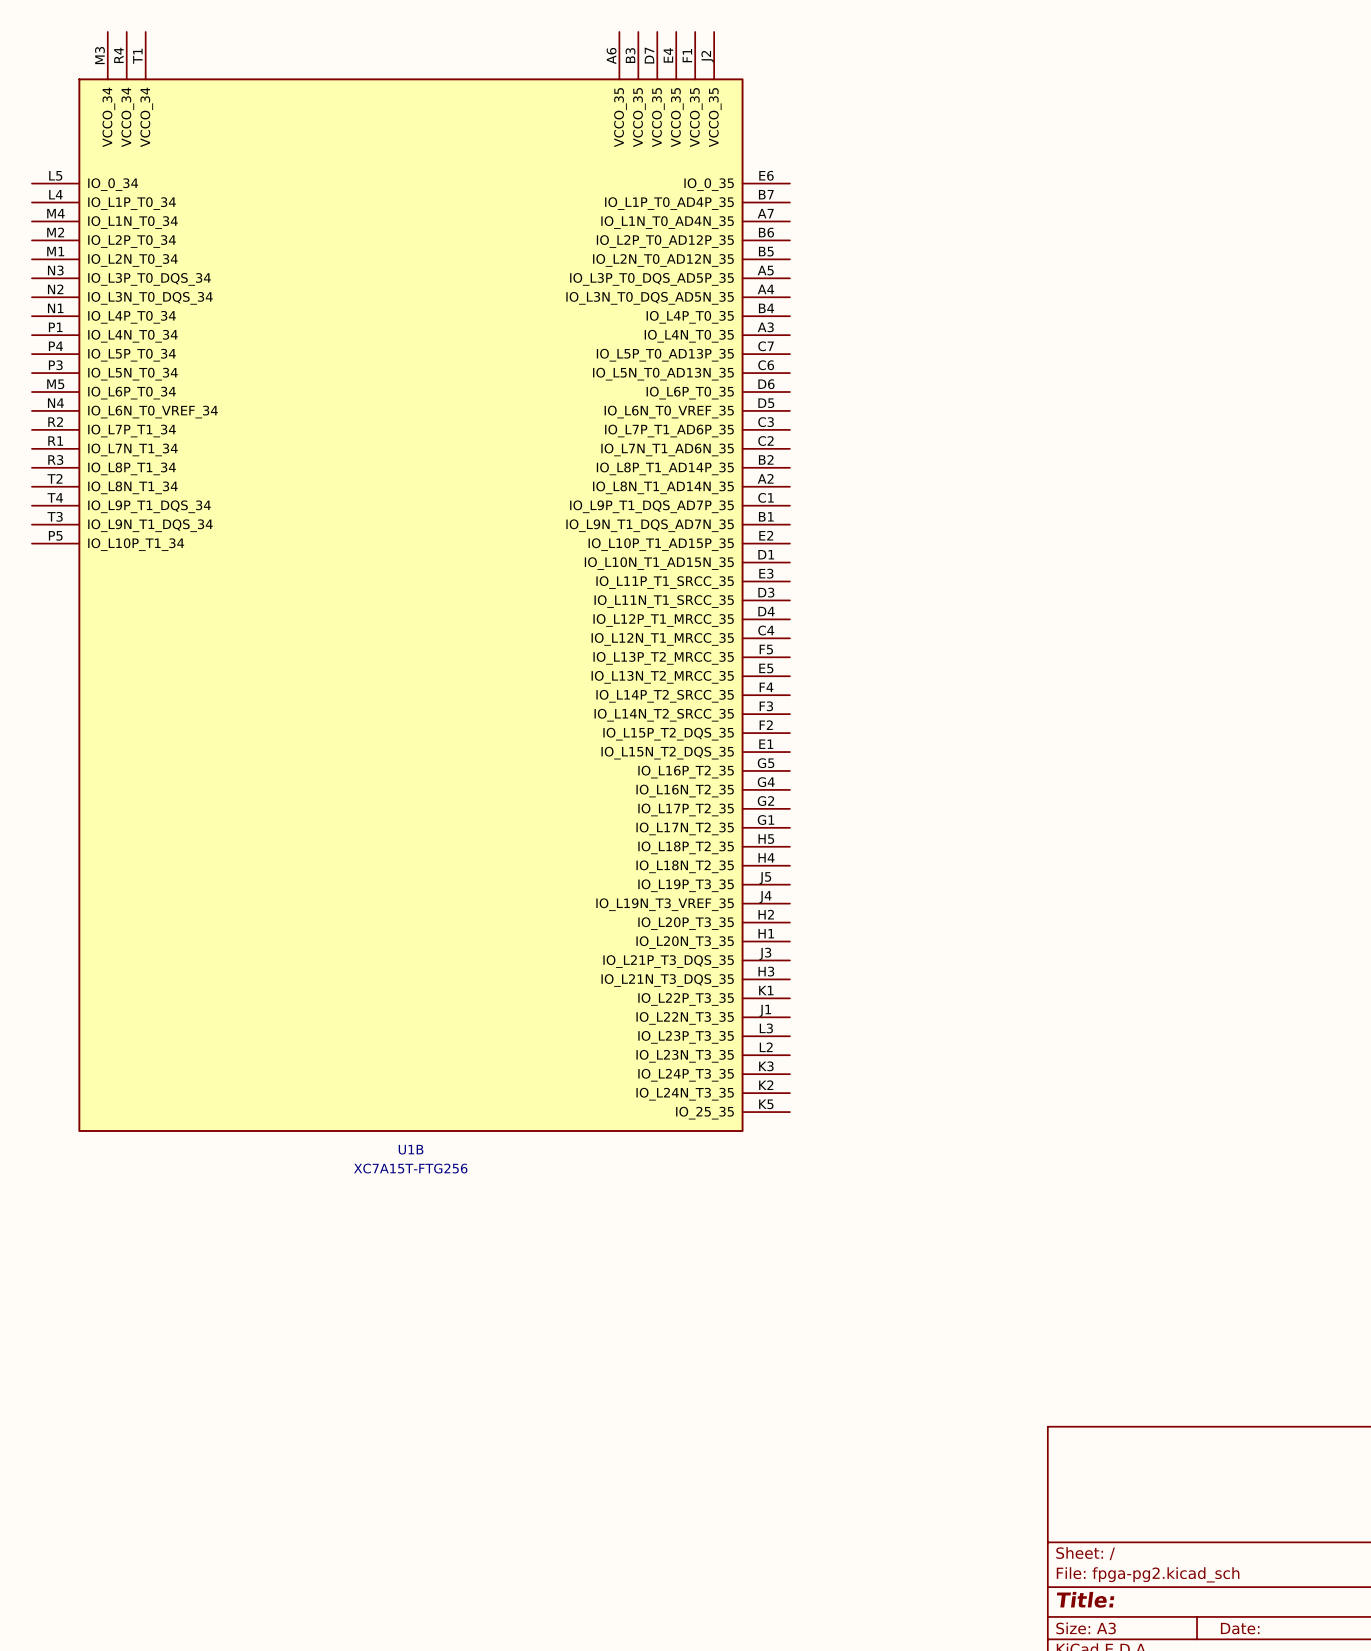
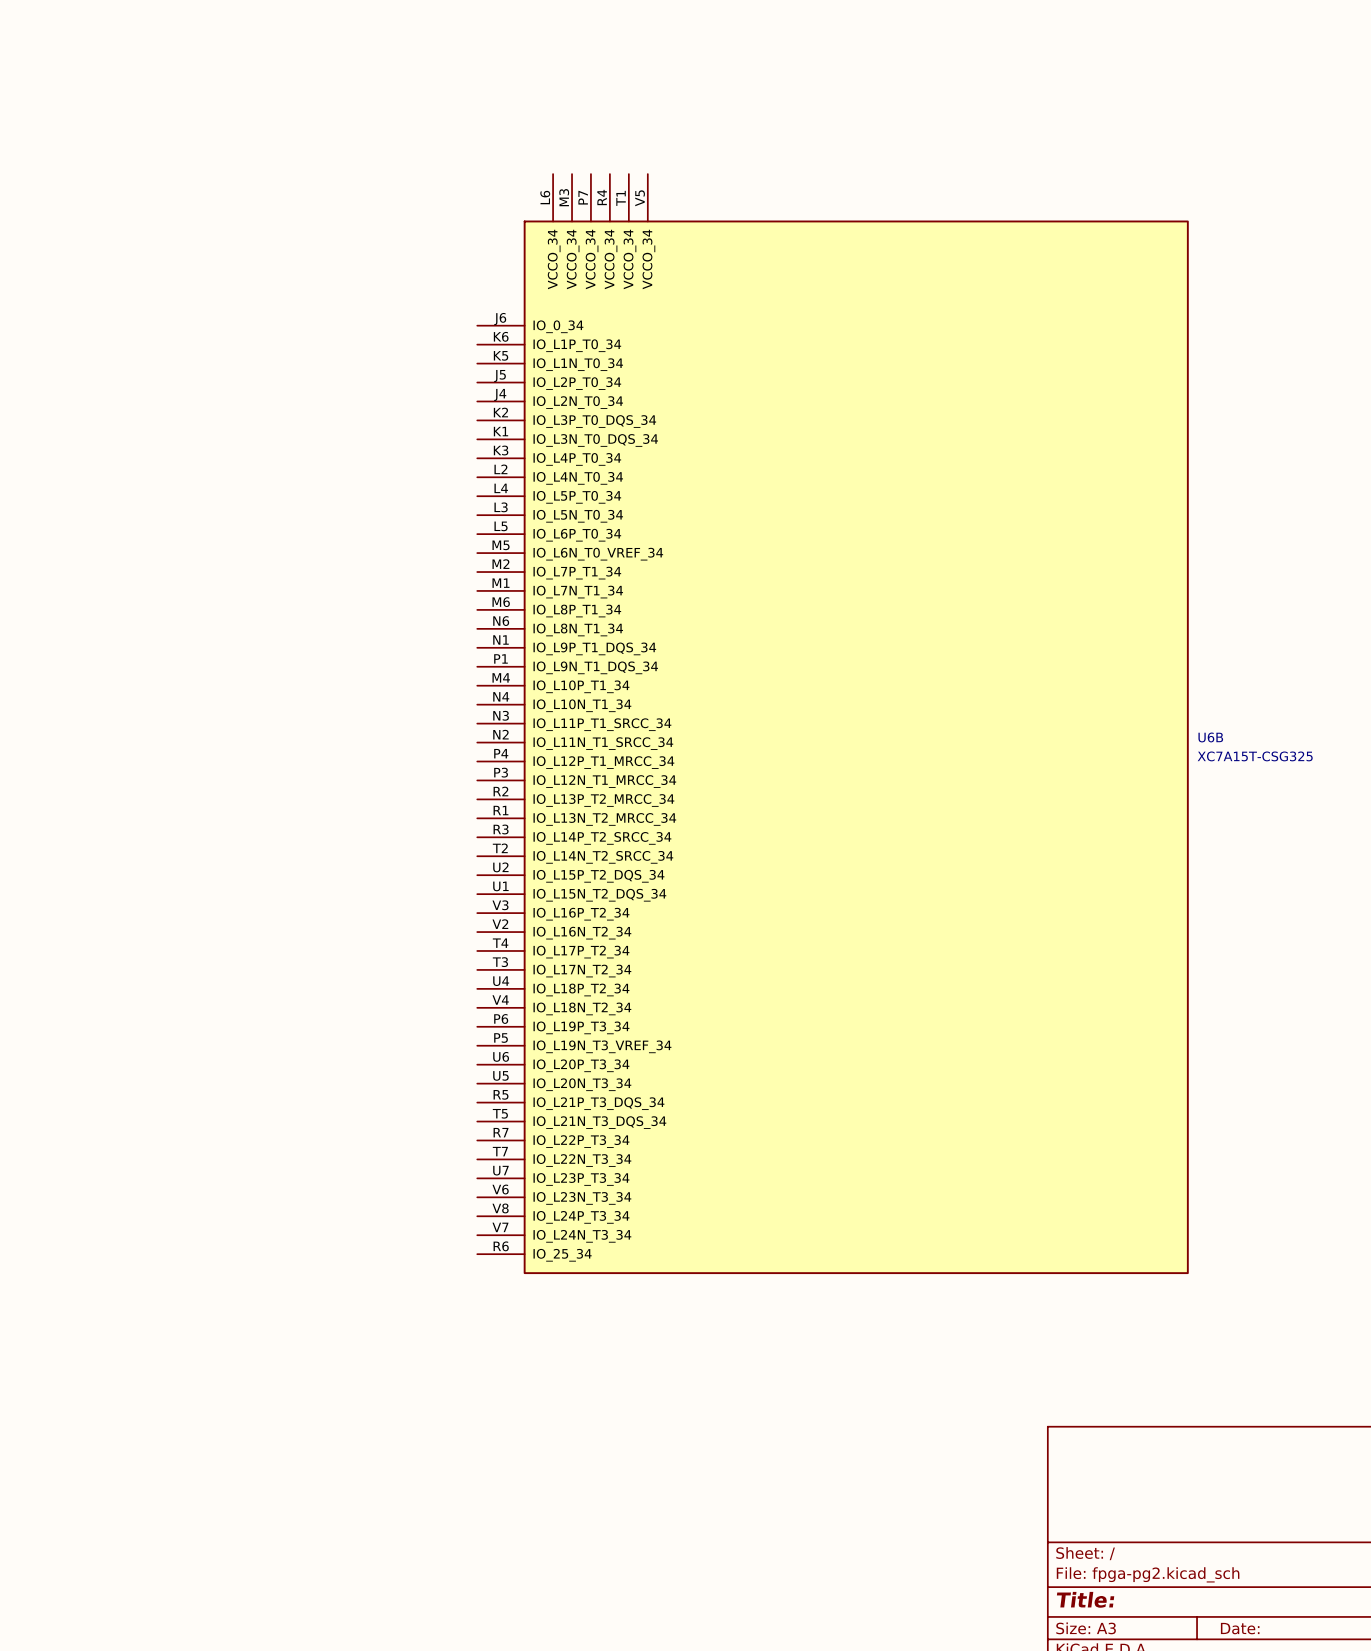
U1B: XC7A15T-FTG256 (410, 581) -> none
U6B: none -> XC7A15T-CSG325 (833, 724)

